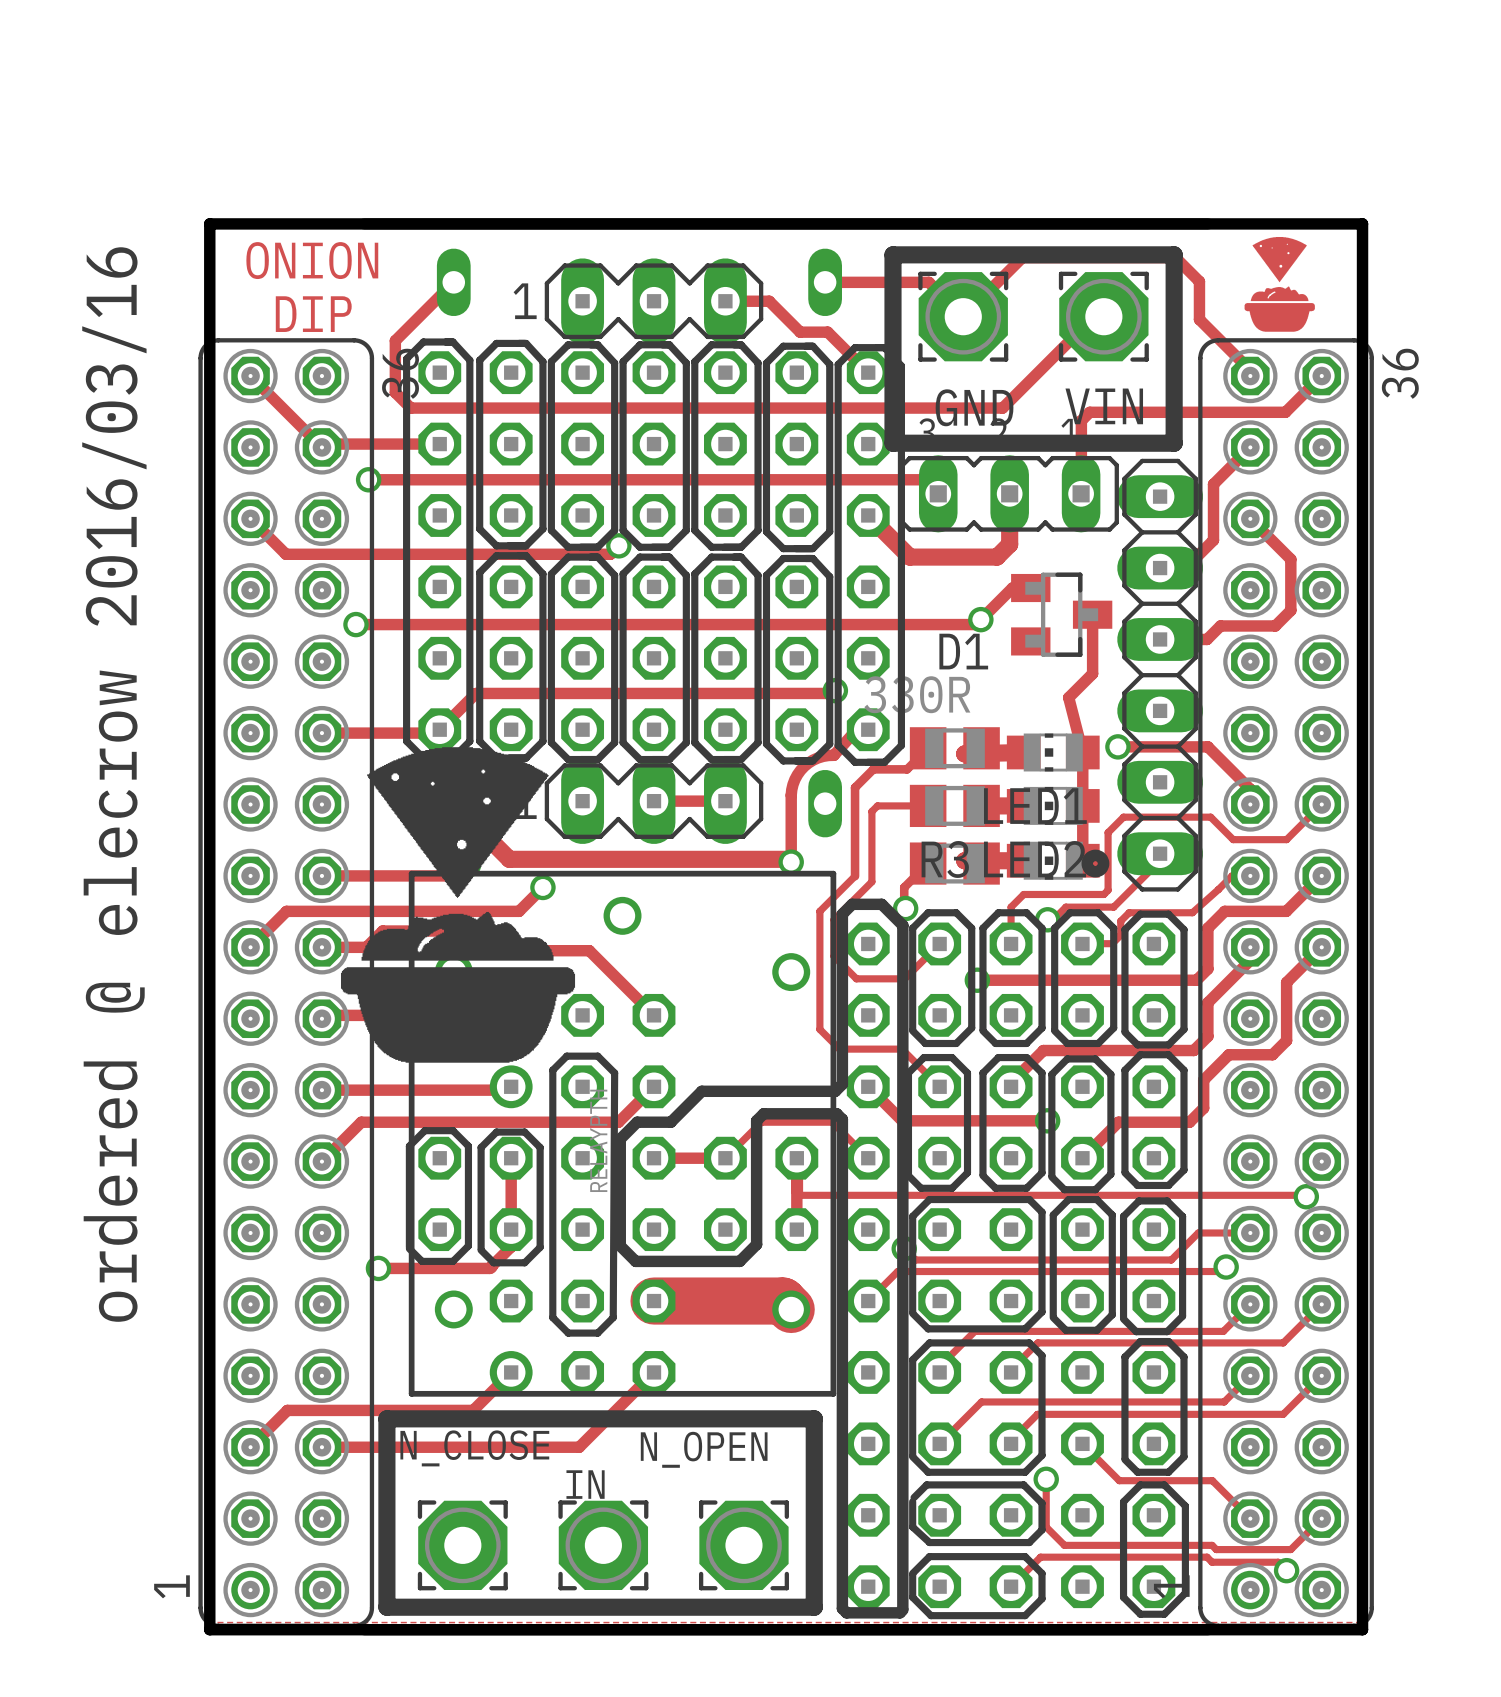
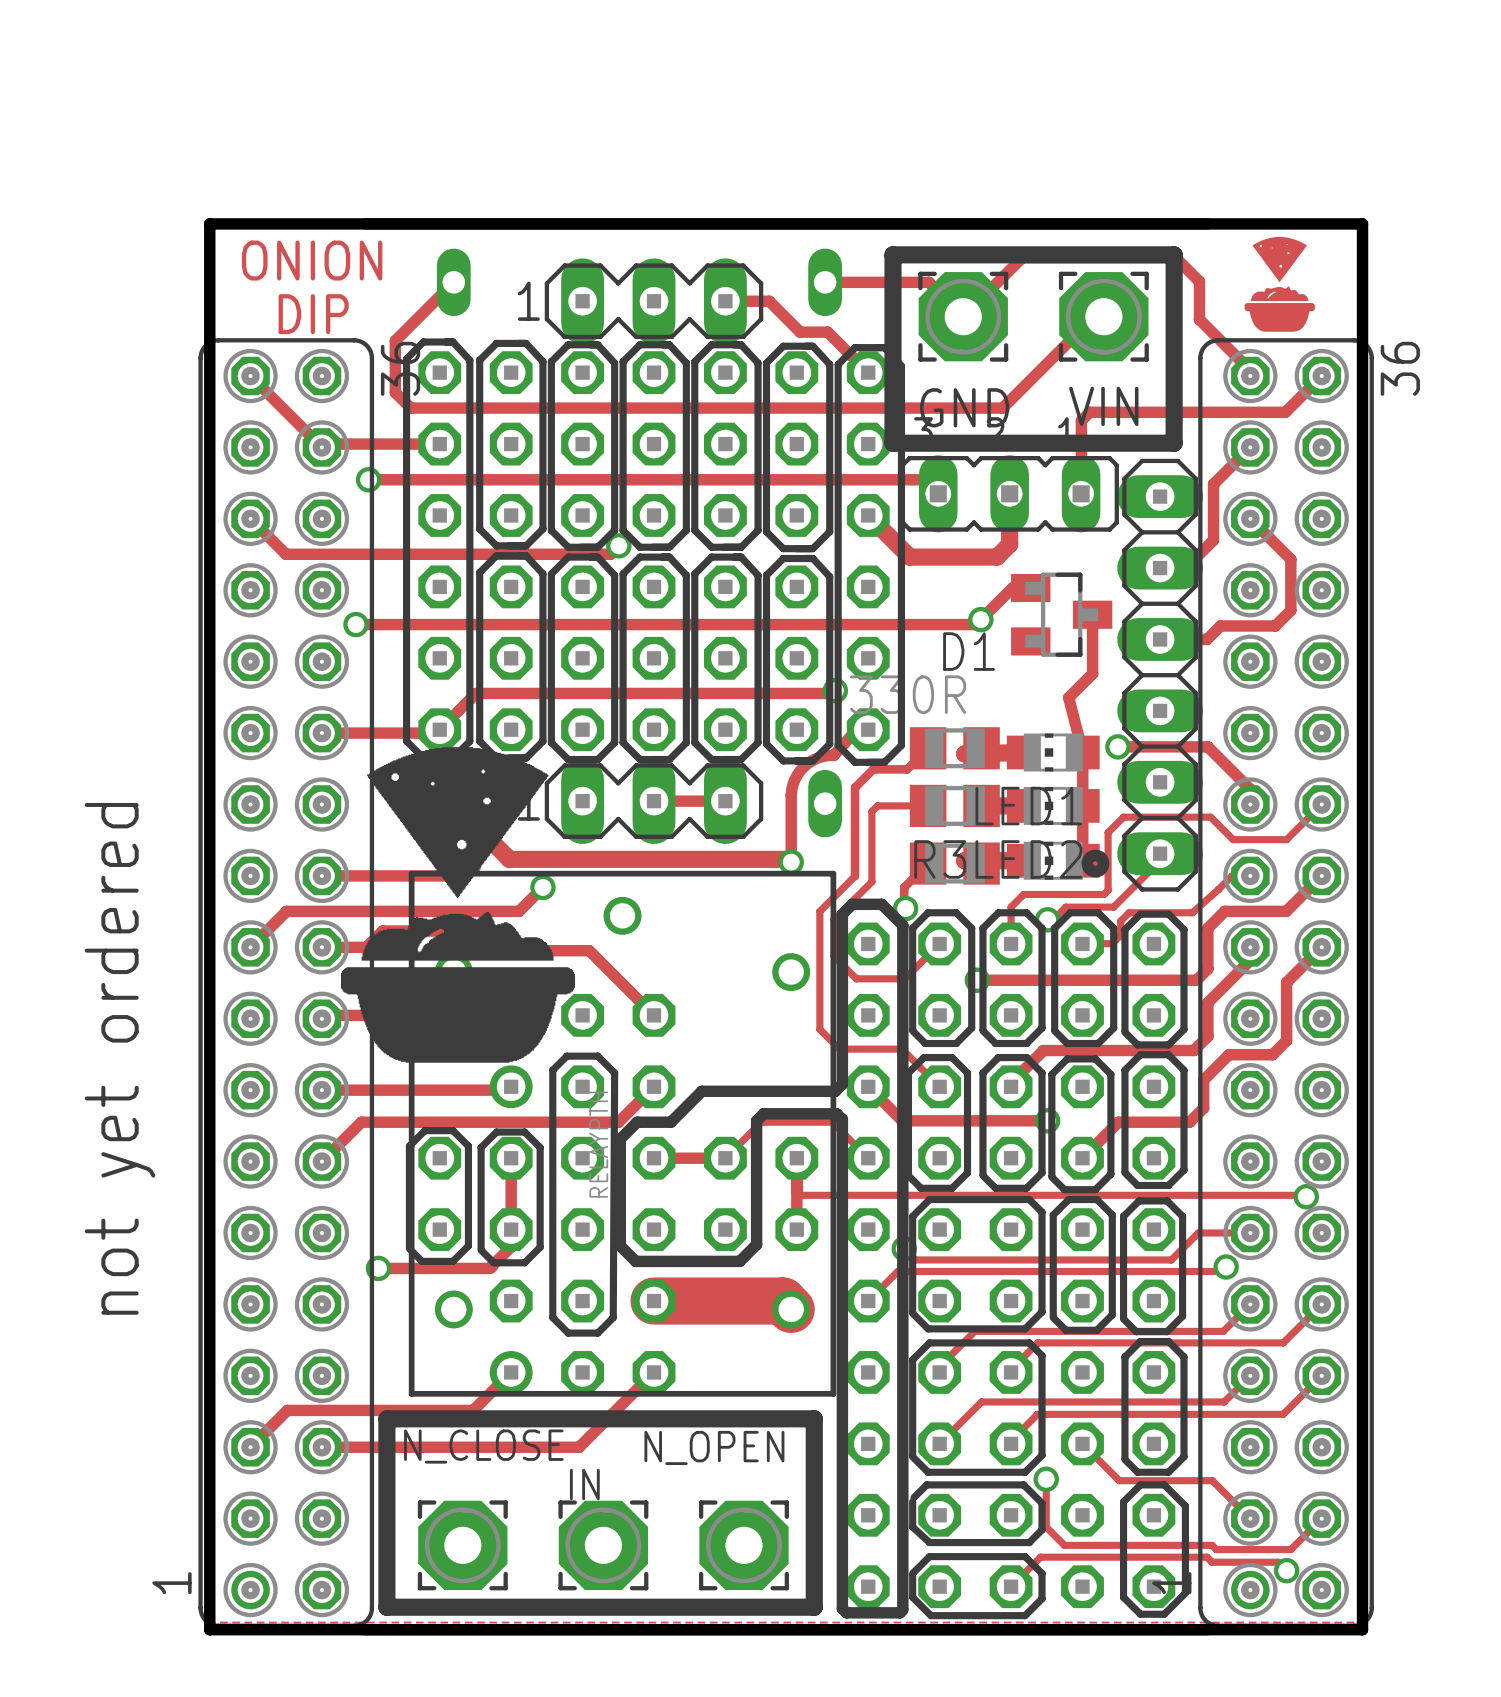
text: ordered @ elecrow 2016/03/16 (114, 784) -> not yet ordered (120, 1058)

